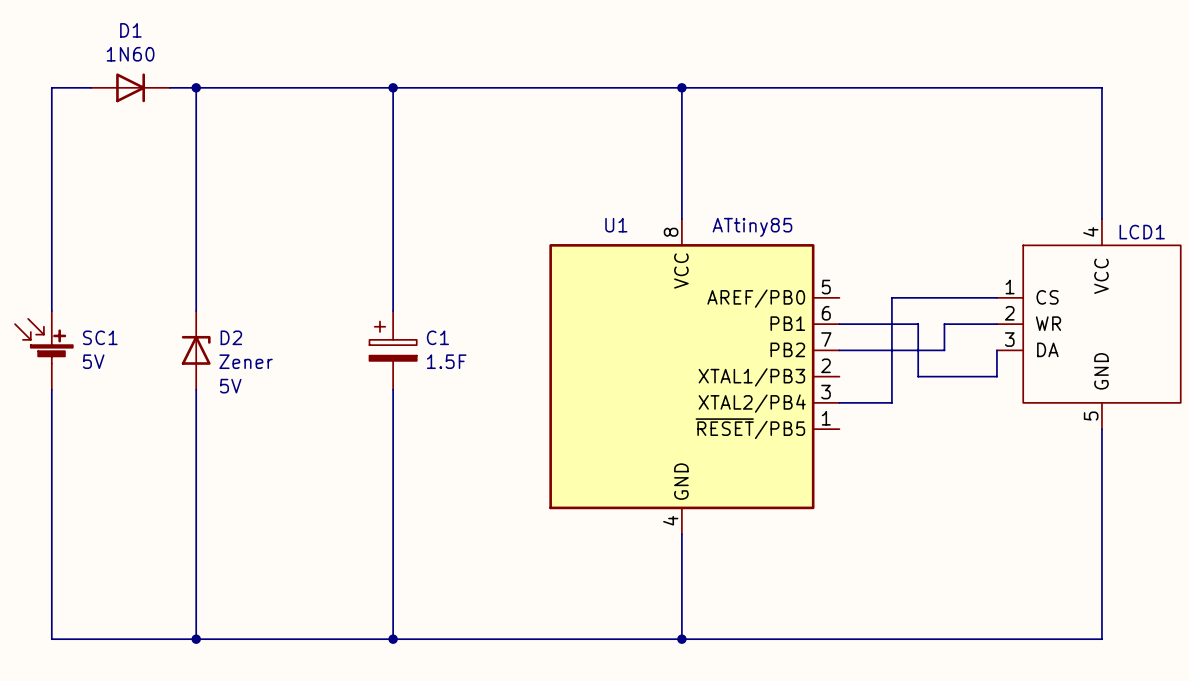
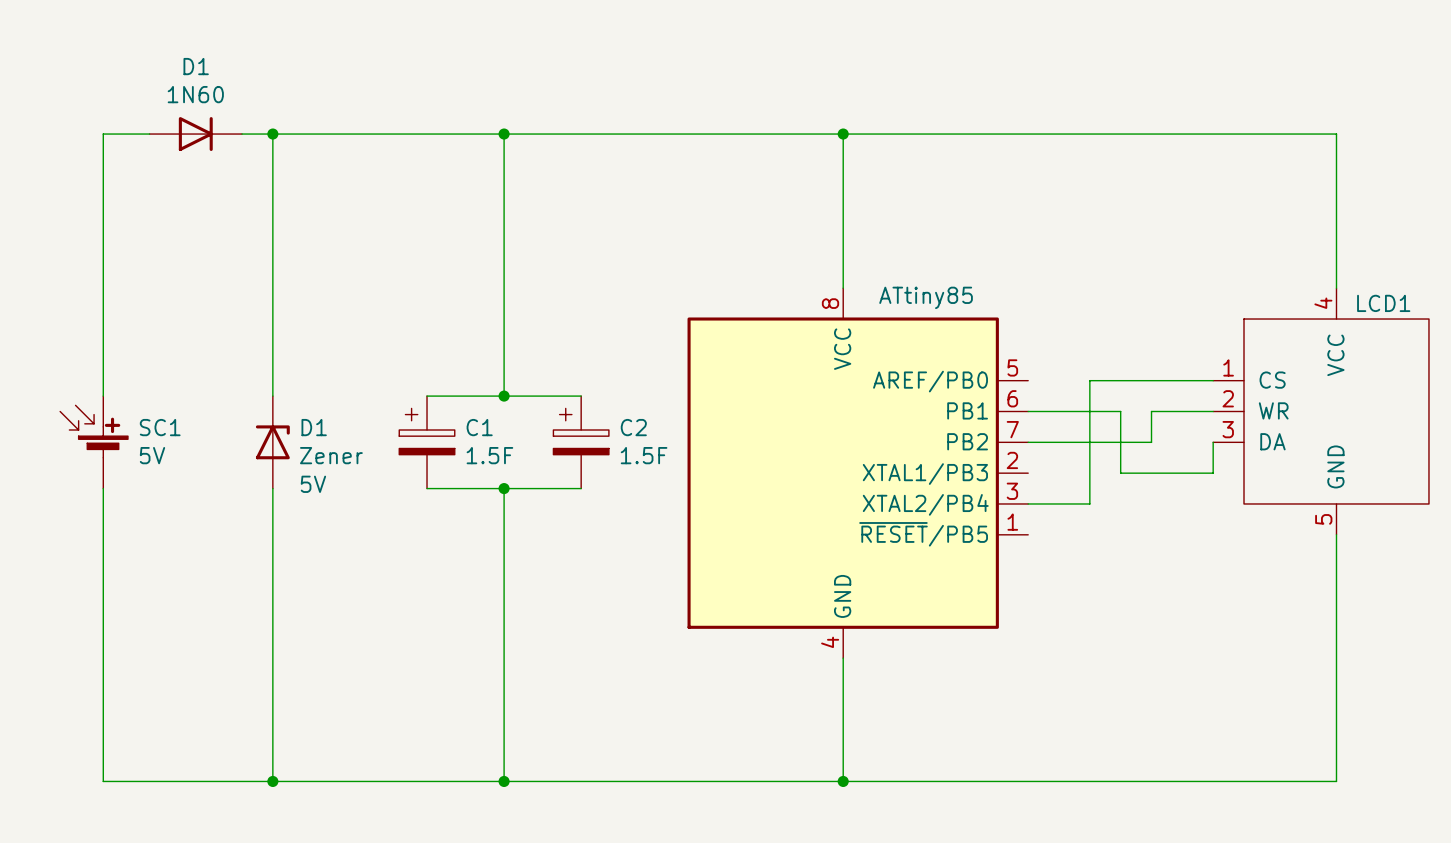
U1 name: U1 (616, 225) -> none
wire: none -> (427, 396) (581, 396)
junction: none -> (504, 396)
D2 name: D2 (231, 337) -> D1 (314, 427)
C1 position: (393, 350) -> (427, 442)
C2: none -> 1.5F (581, 442)
wire: none -> (427, 488) (581, 488)
junction: none -> (504, 488)

